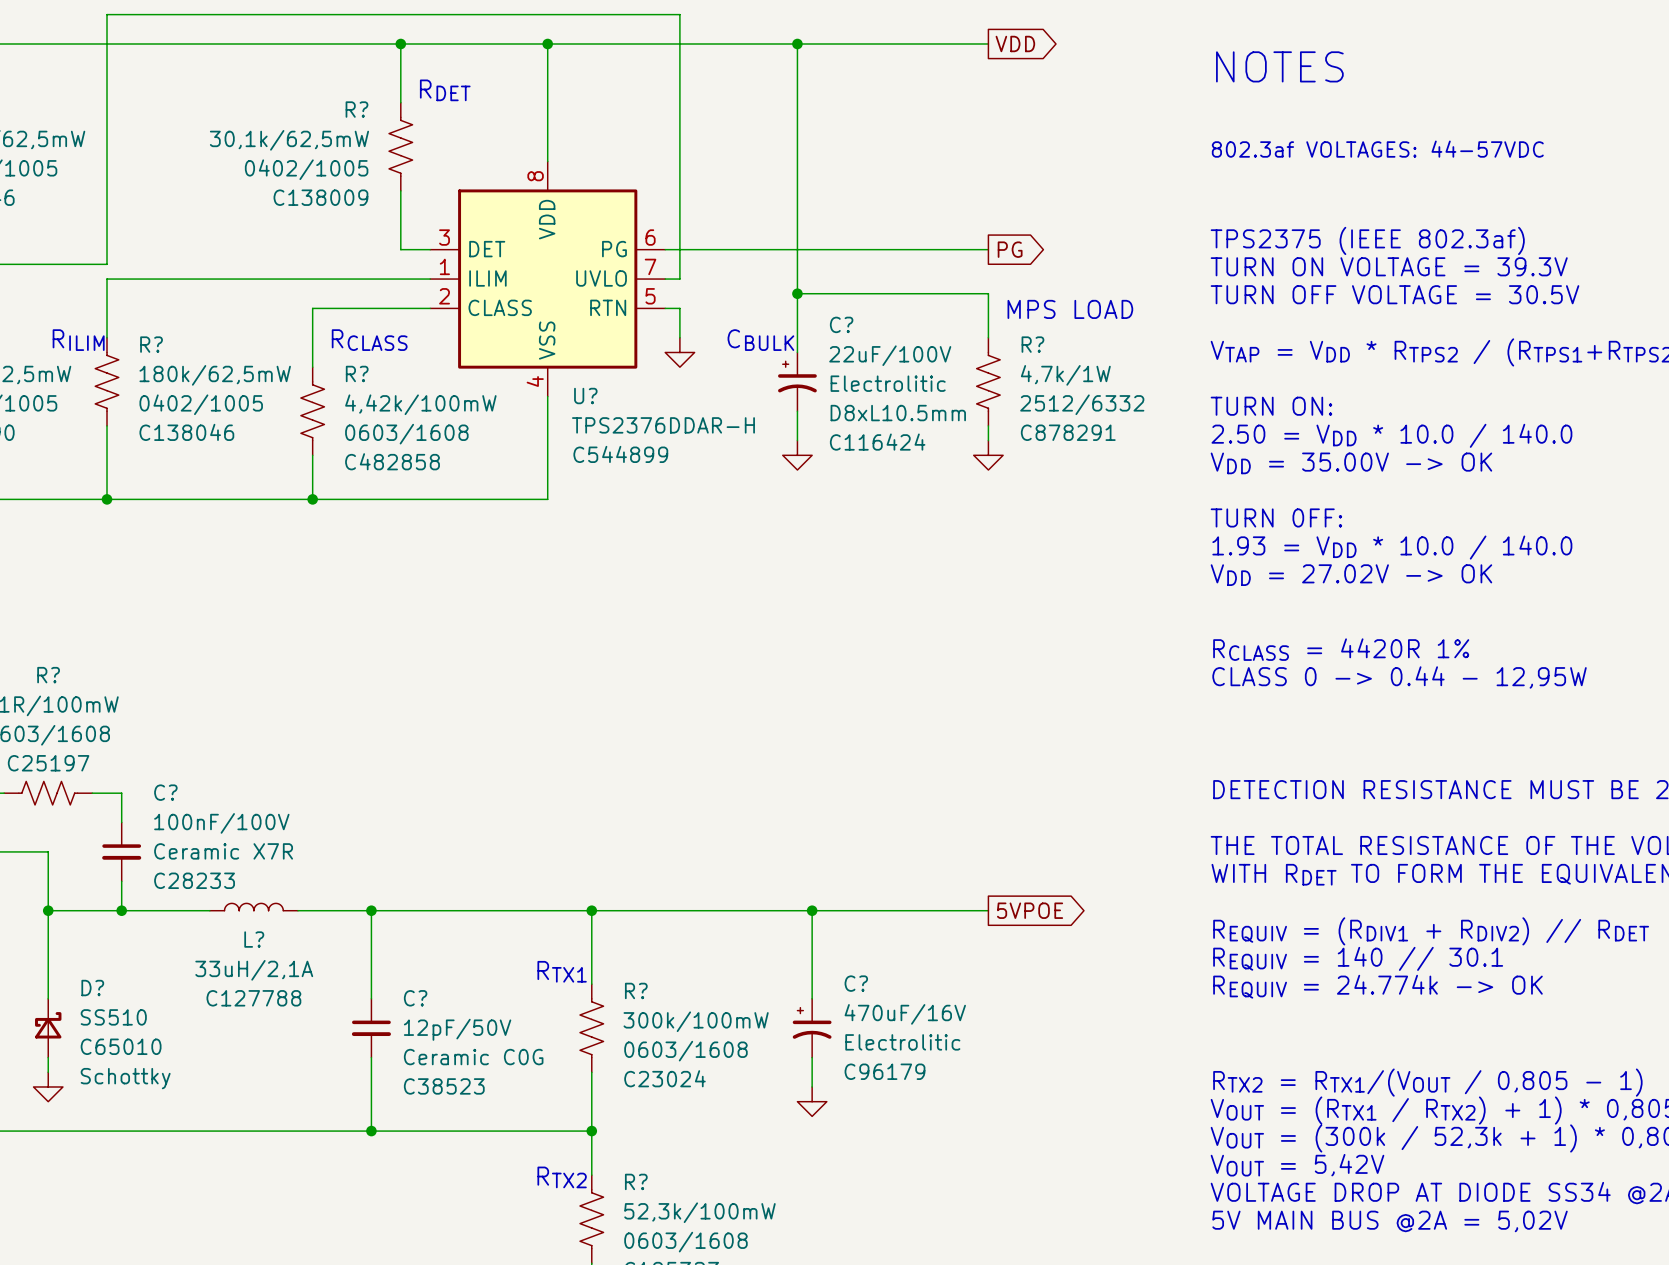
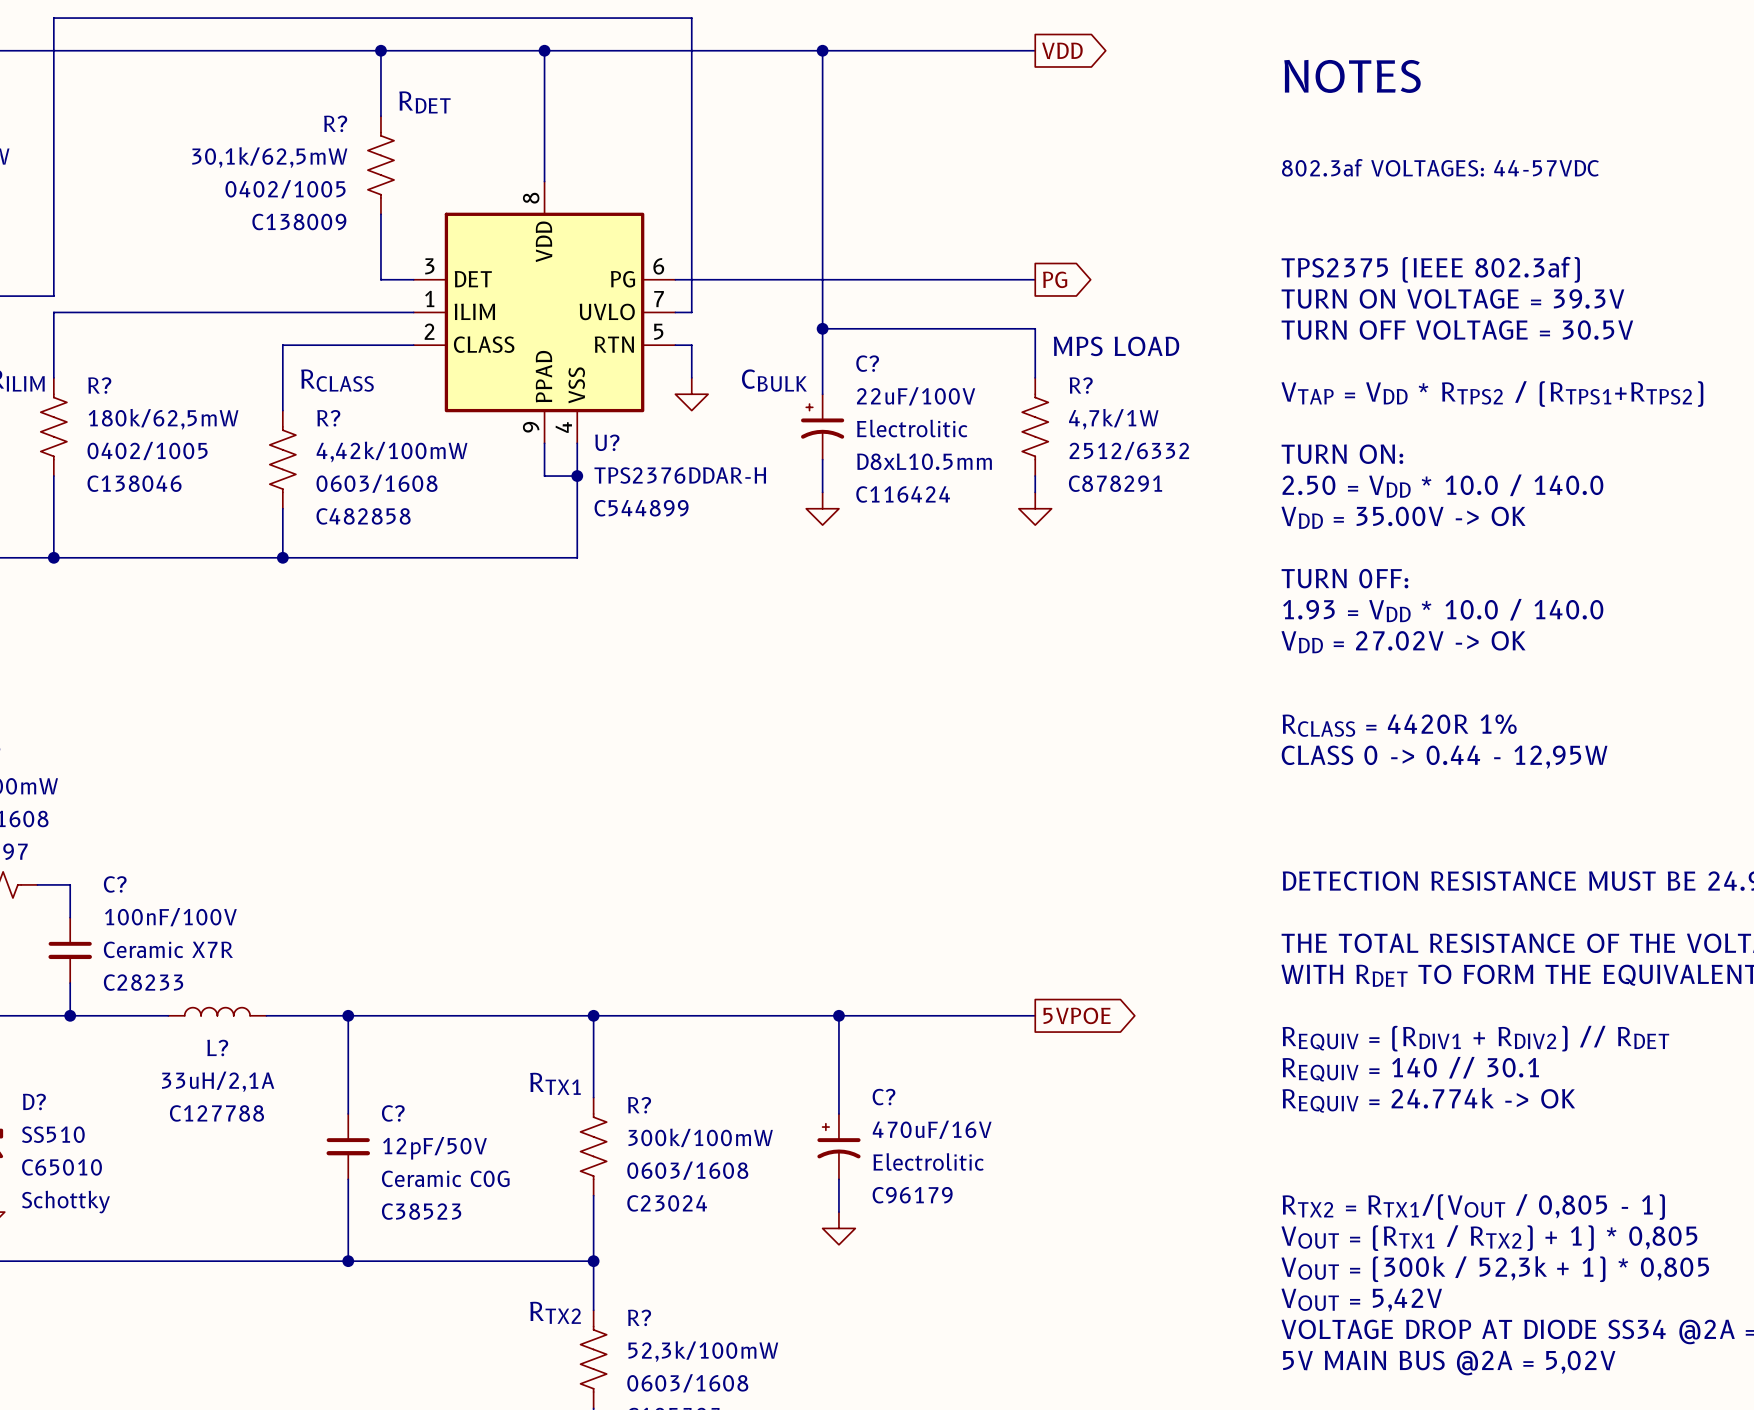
U? symbol: [430, 161, 666, 397] -> [413, 181, 676, 444]
wire: (547, 425) (547, 499) -> (577, 443) (577, 557) (544, 557)
wire: none -> (544, 476) (577, 476)
junction: none -> (577, 476)

